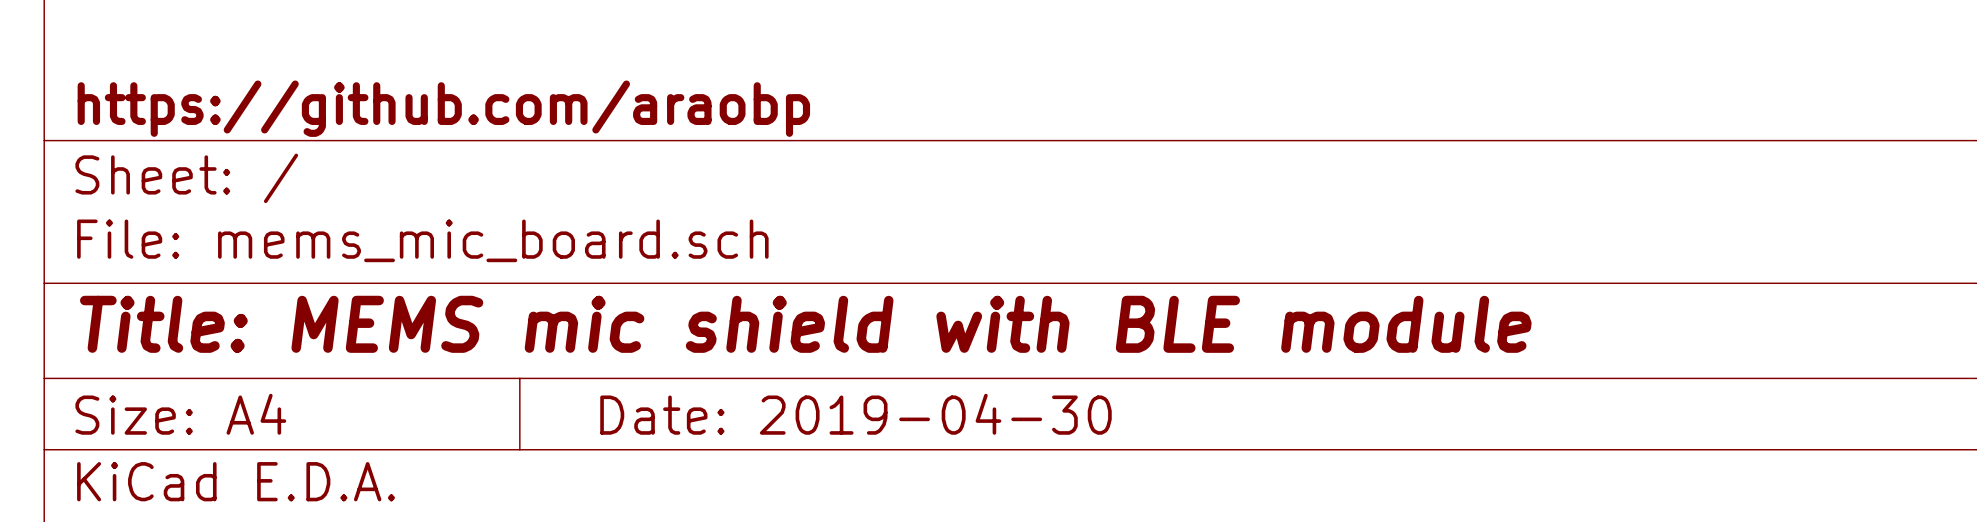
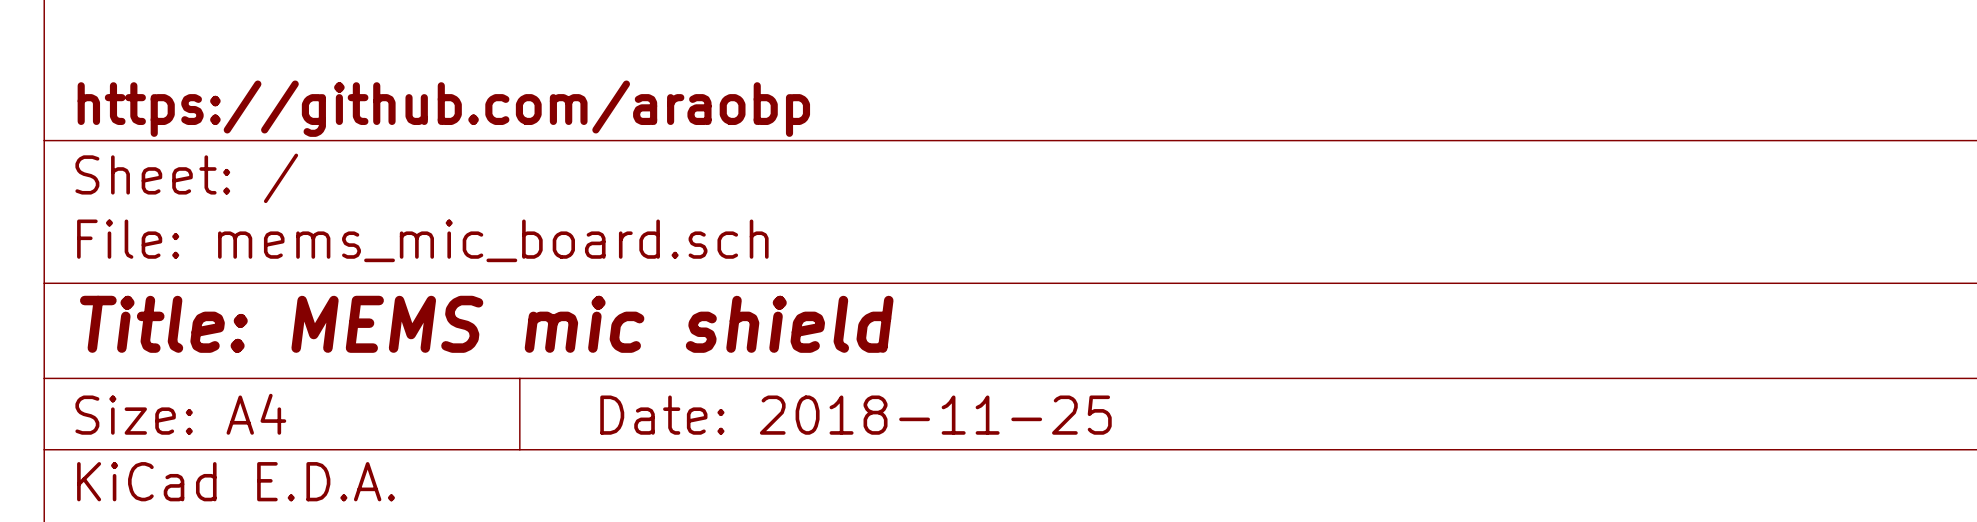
title block: Title: MEMS mic shield with BLE module (805, 324) -> Title: MEMS mic shield (486, 324)
title block: Date: 2019-04-30 (855, 414) -> Date: 2018-11-25 (855, 415)

